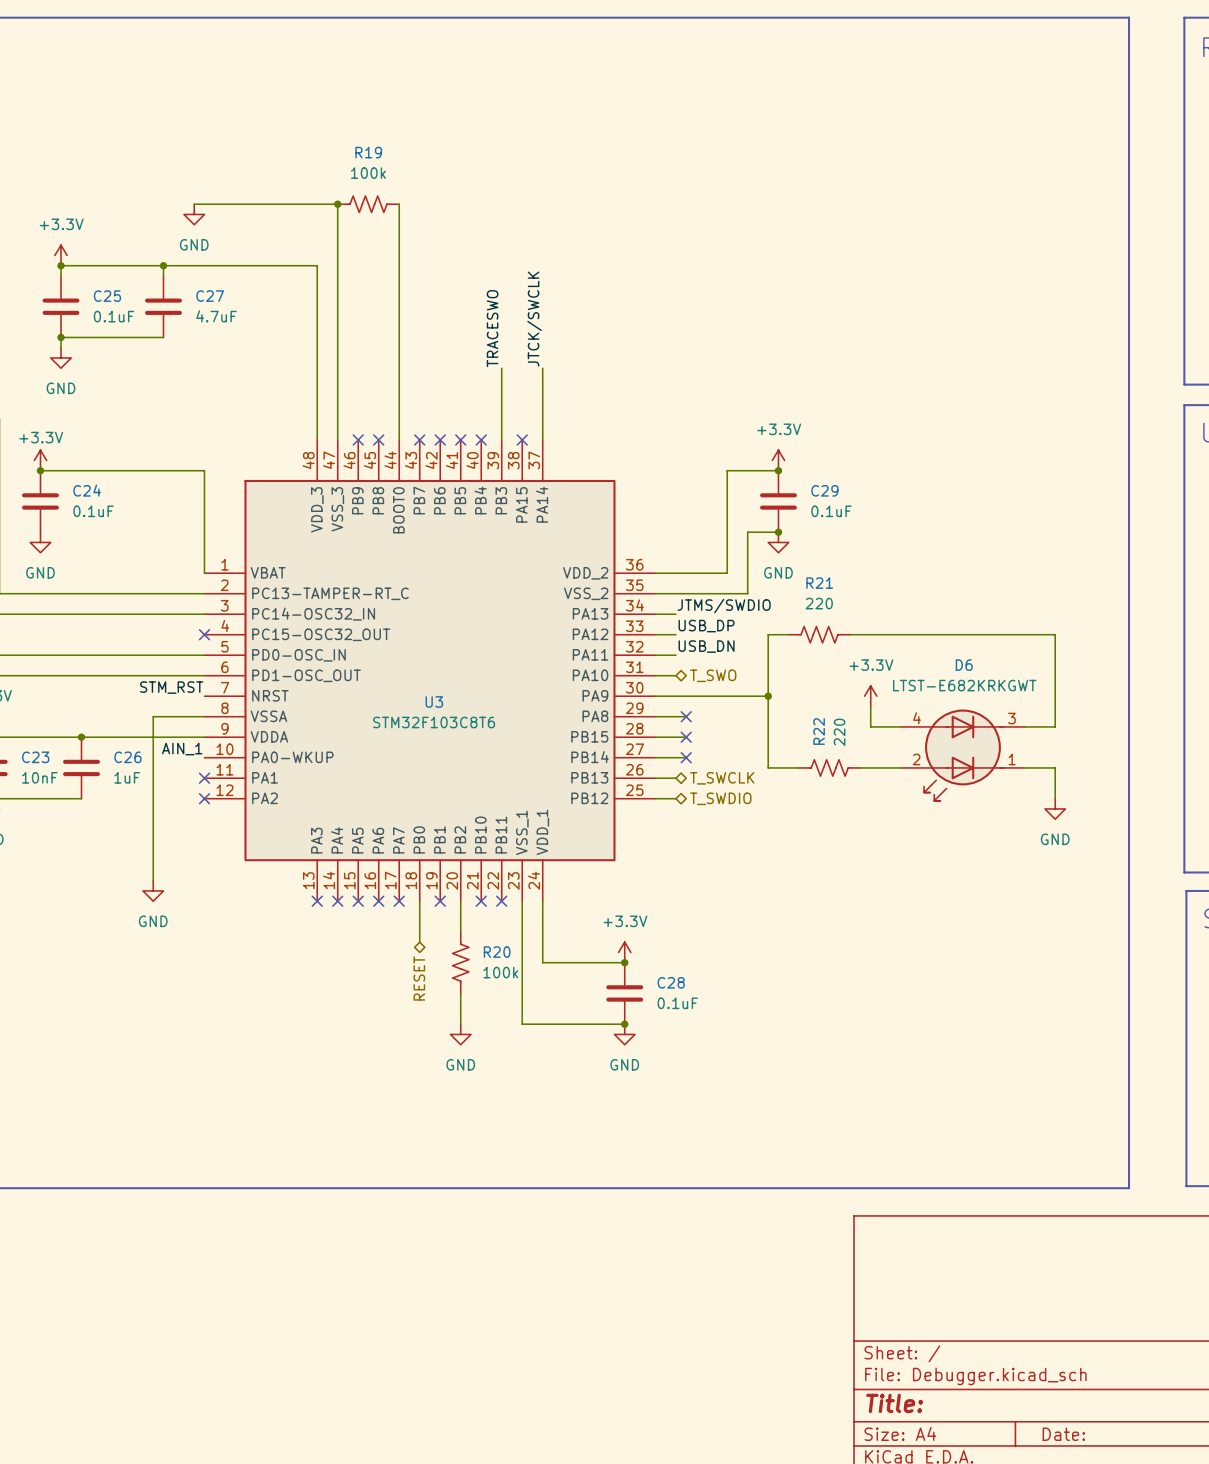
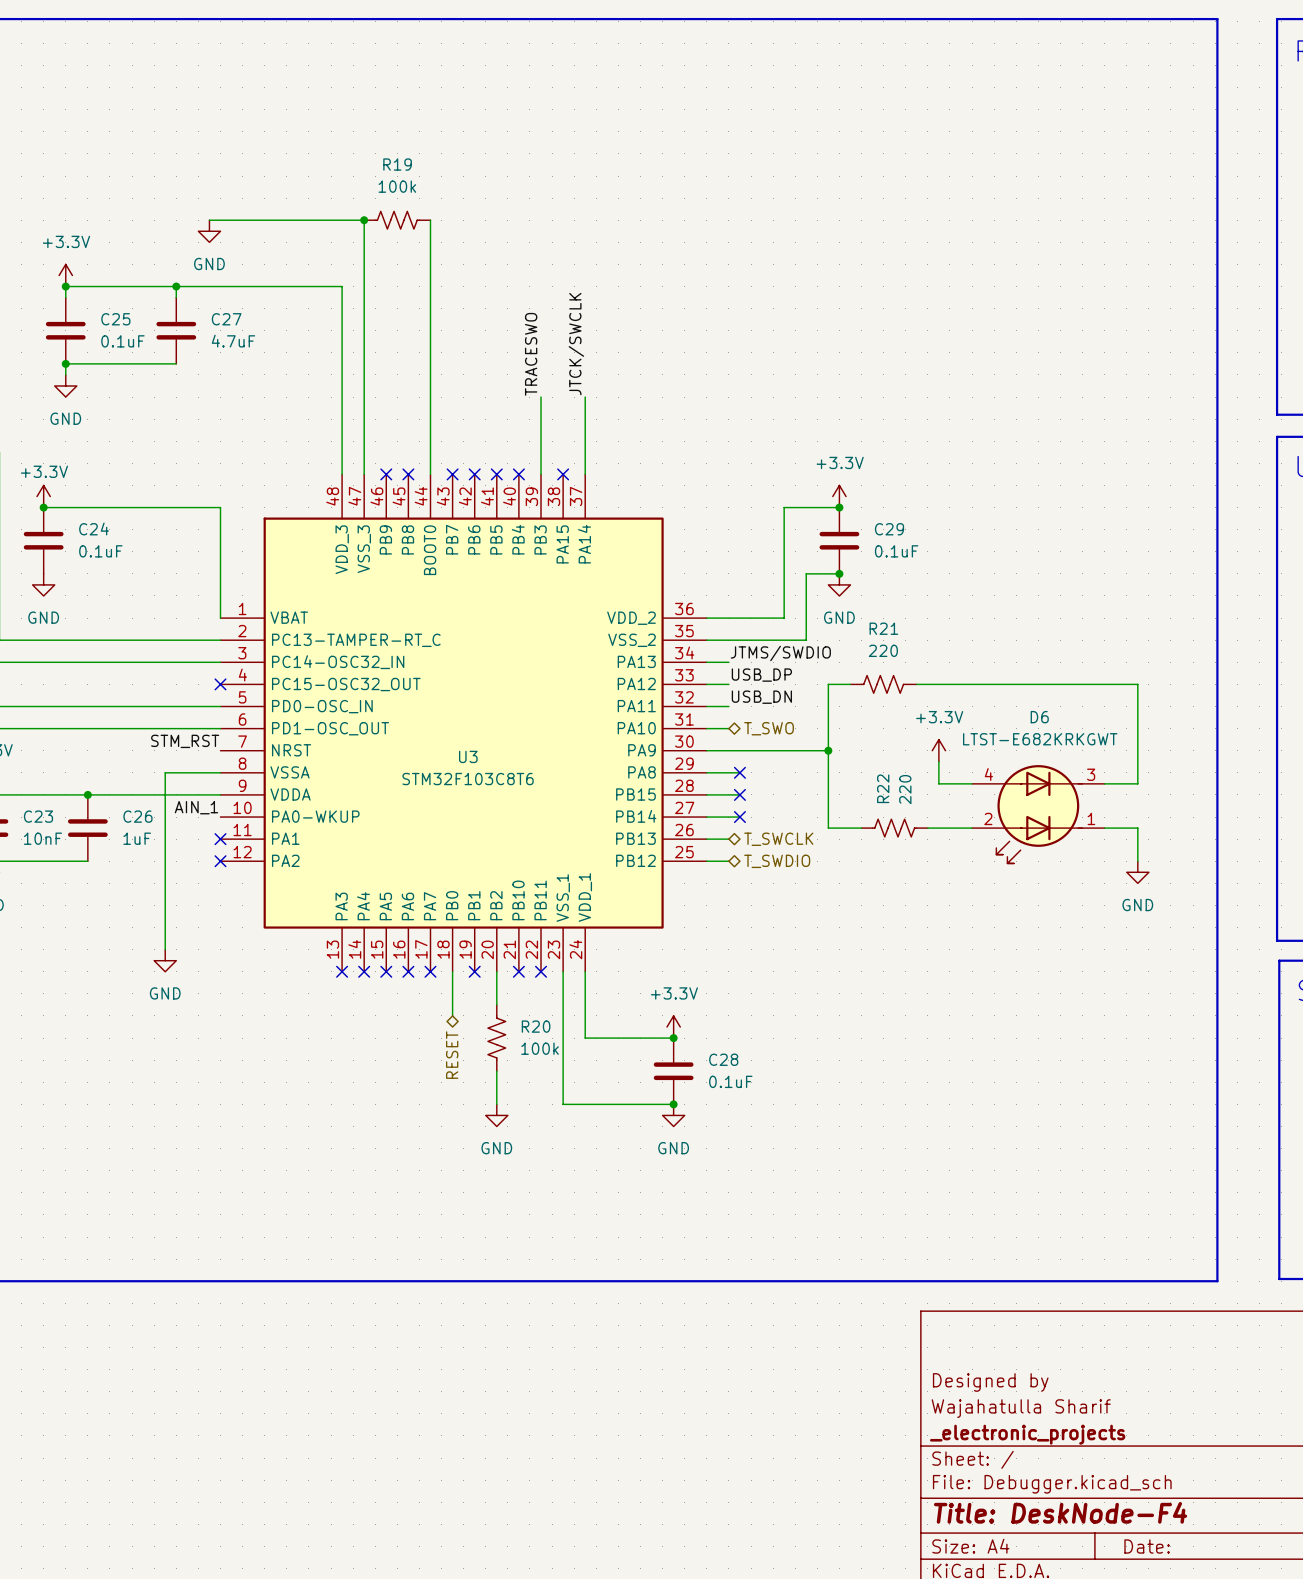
title block: none -> Designed by (990, 1382)
title block: none -> Wajahatulla Sharif (1021, 1408)
title block: none -> _electronic_projects (1027, 1434)
title block: Title: (894, 1403) -> Title: DeskNode-F4 (1060, 1512)

